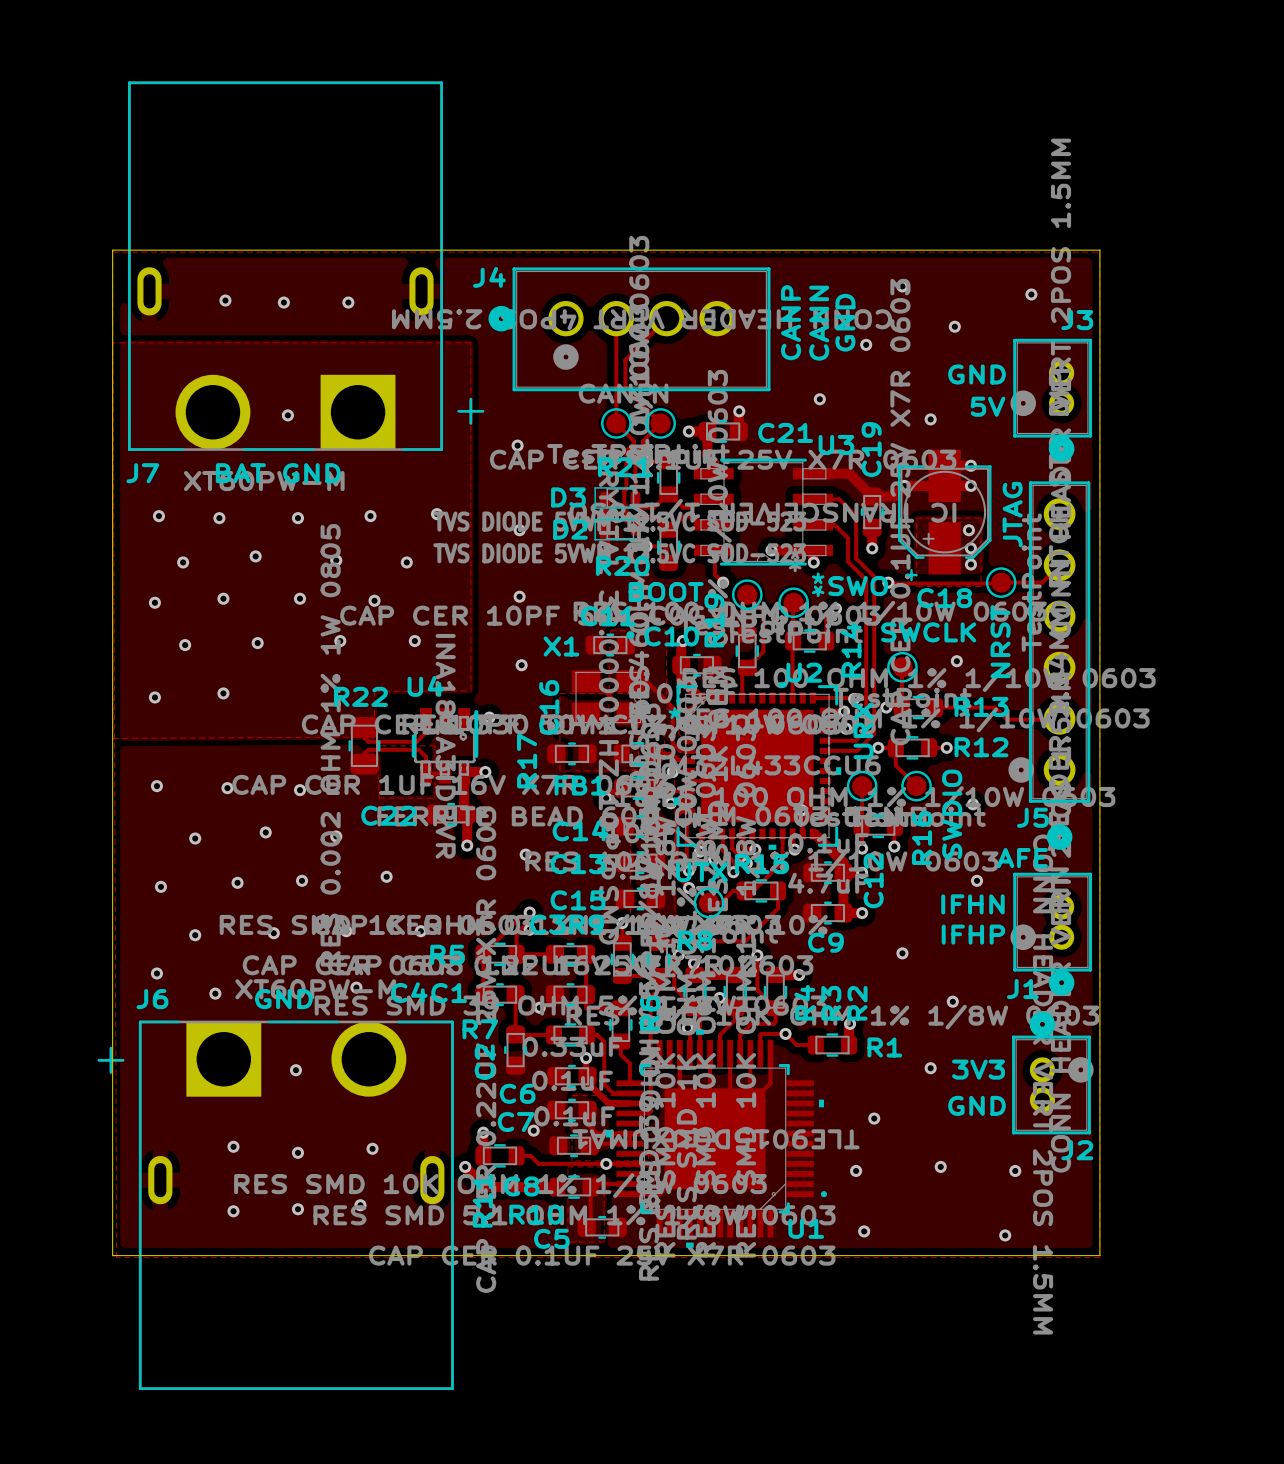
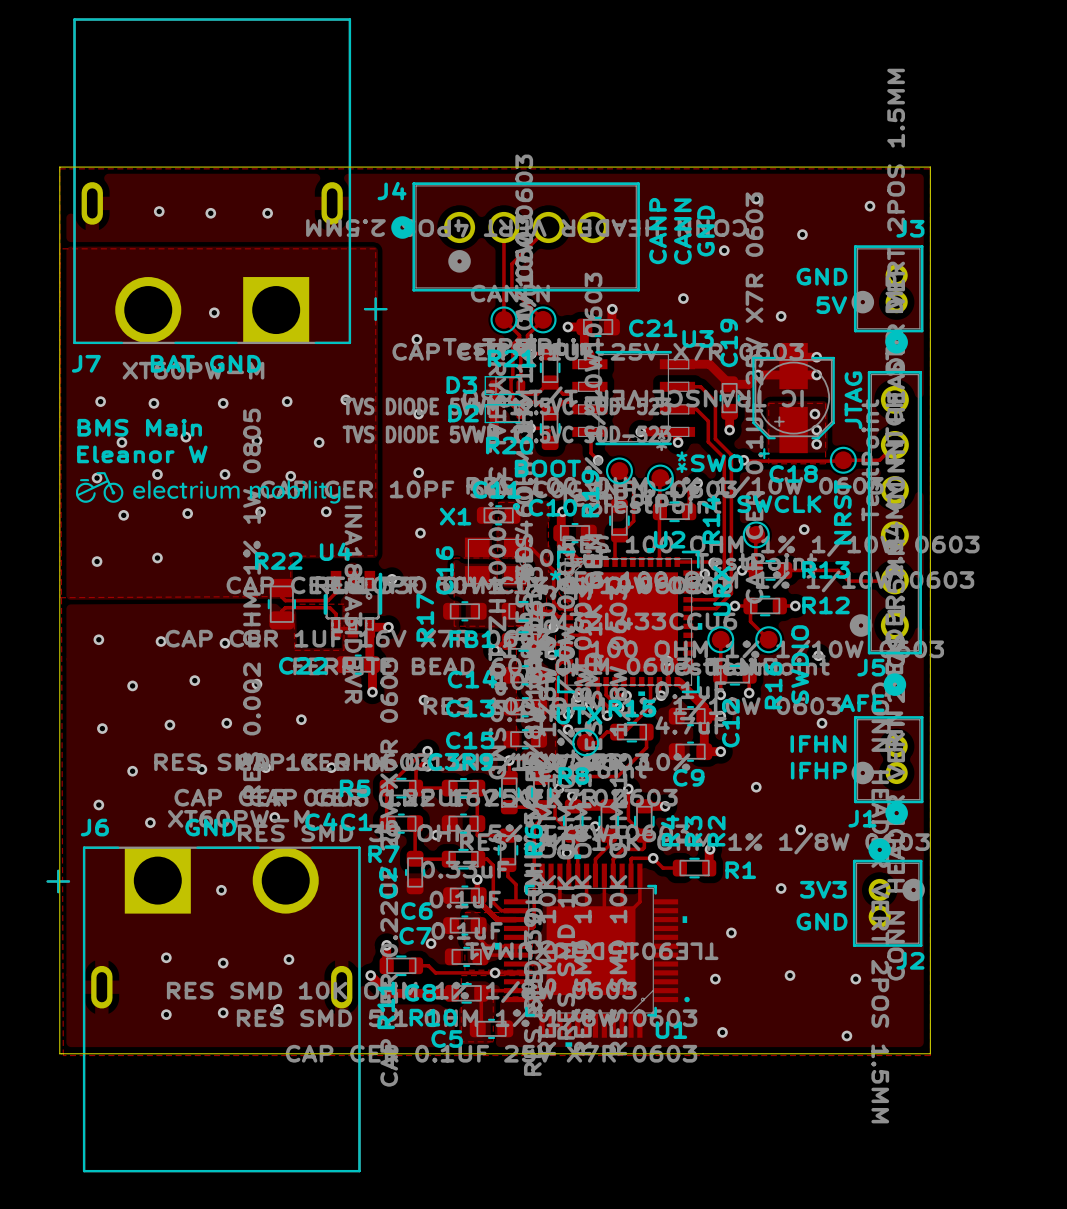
text: none -> BMS Main (139, 427)
text: none -> Eleanor W (142, 454)
drawing: none -> [75, 472, 341, 504]

